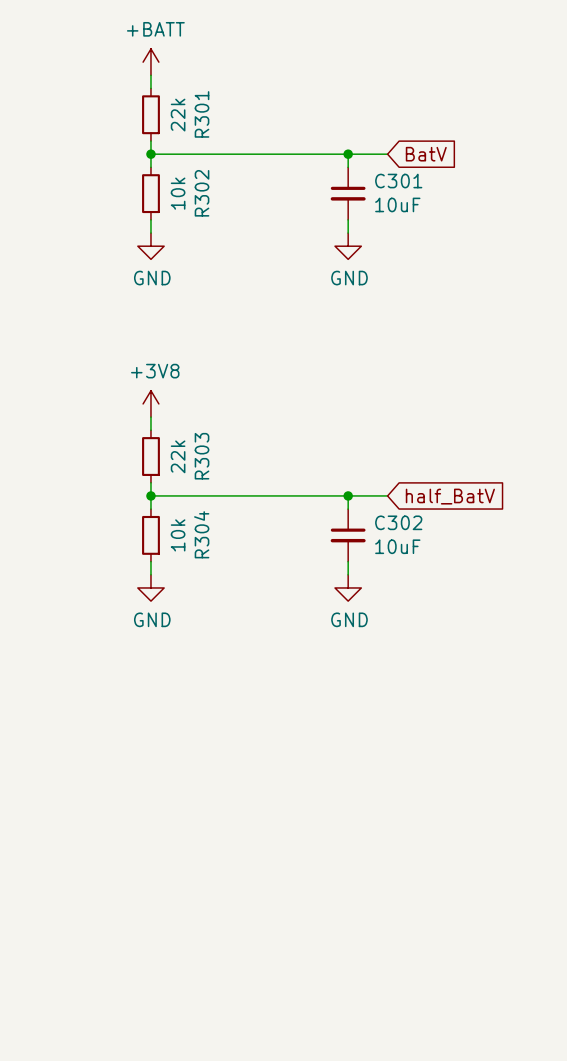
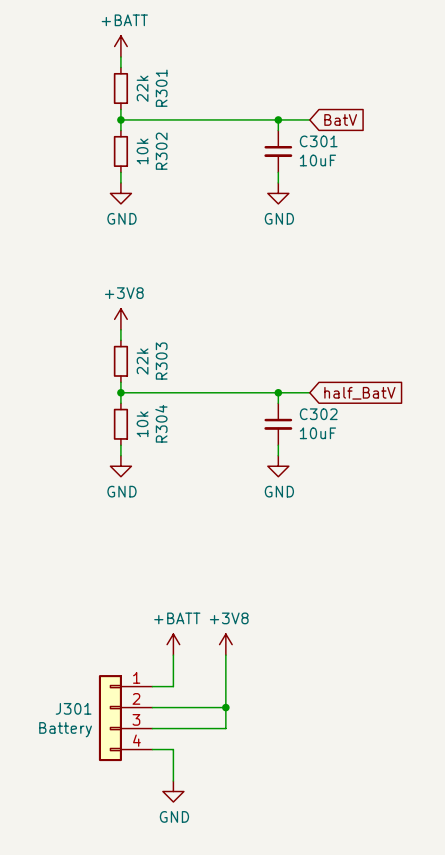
power symbol: none -> +BATT (173, 644)
power symbol: none -> +3V8 (225, 644)
wire: none -> (173, 655) (173, 686) (152, 686)
wire: none -> (225, 655) (225, 728) (152, 728)
wire: none -> (152, 707) (225, 707)
junction: none -> (225, 707)
J301: none -> Battery (125, 718)
wire: none -> (152, 749) (173, 749) (173, 781)
power symbol: none -> GND (173, 791)

